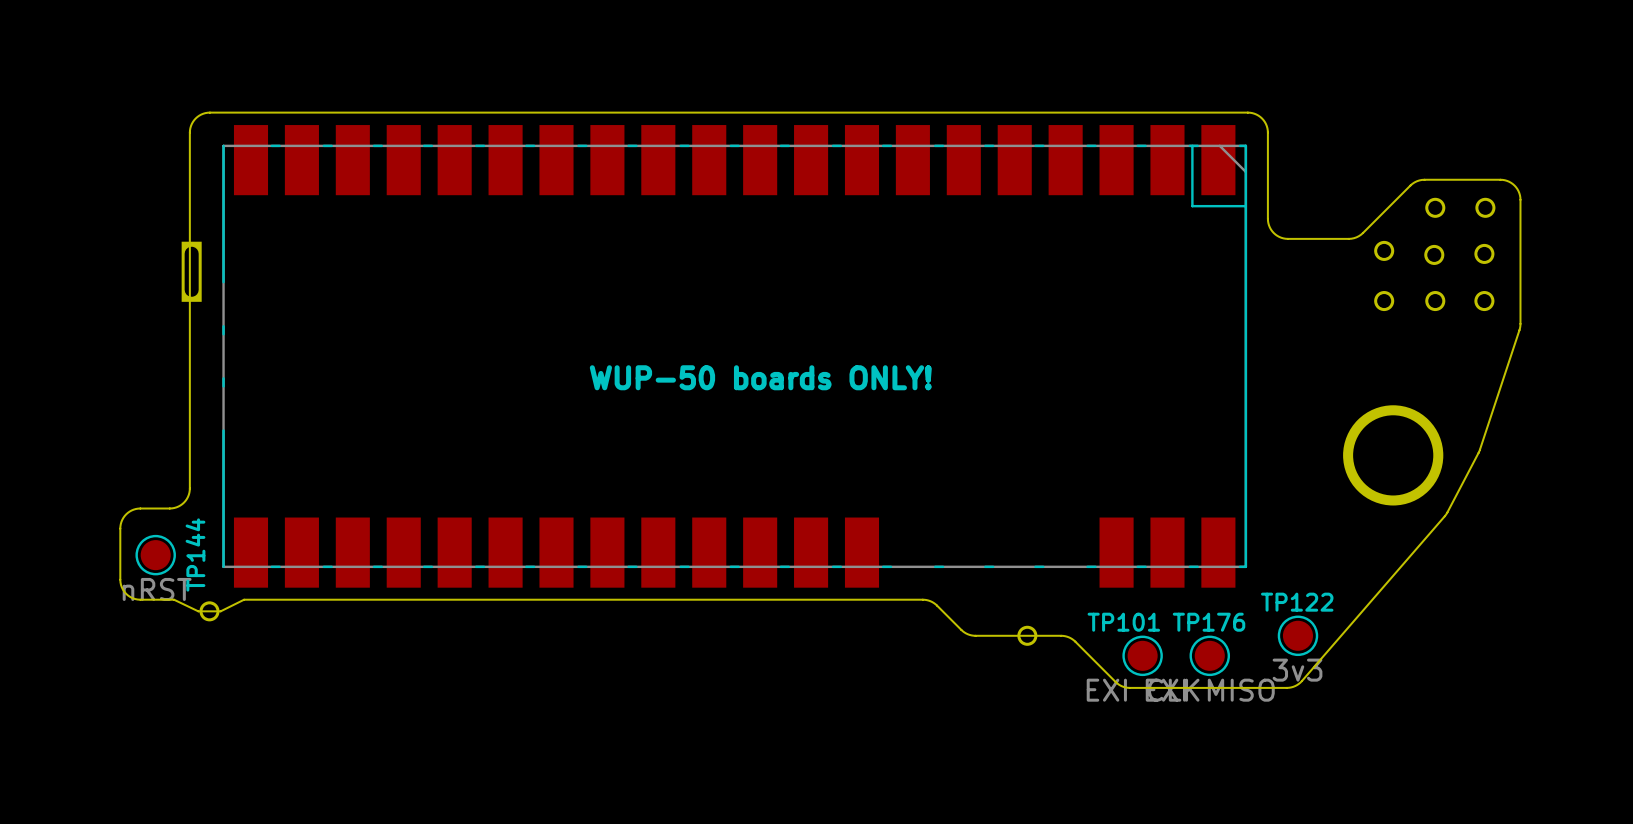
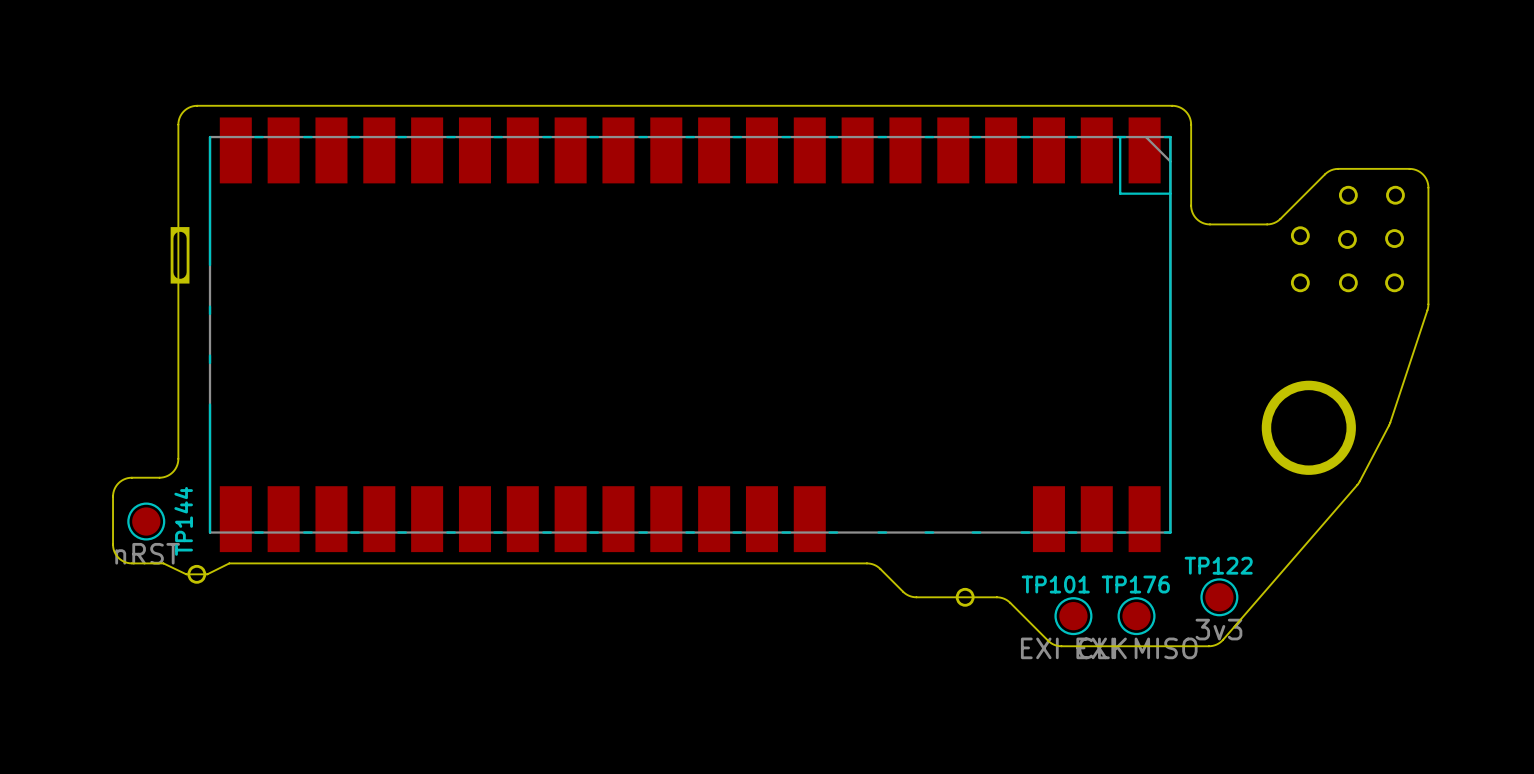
text: WUP-50 boards ONLY! (760, 377) -> none

